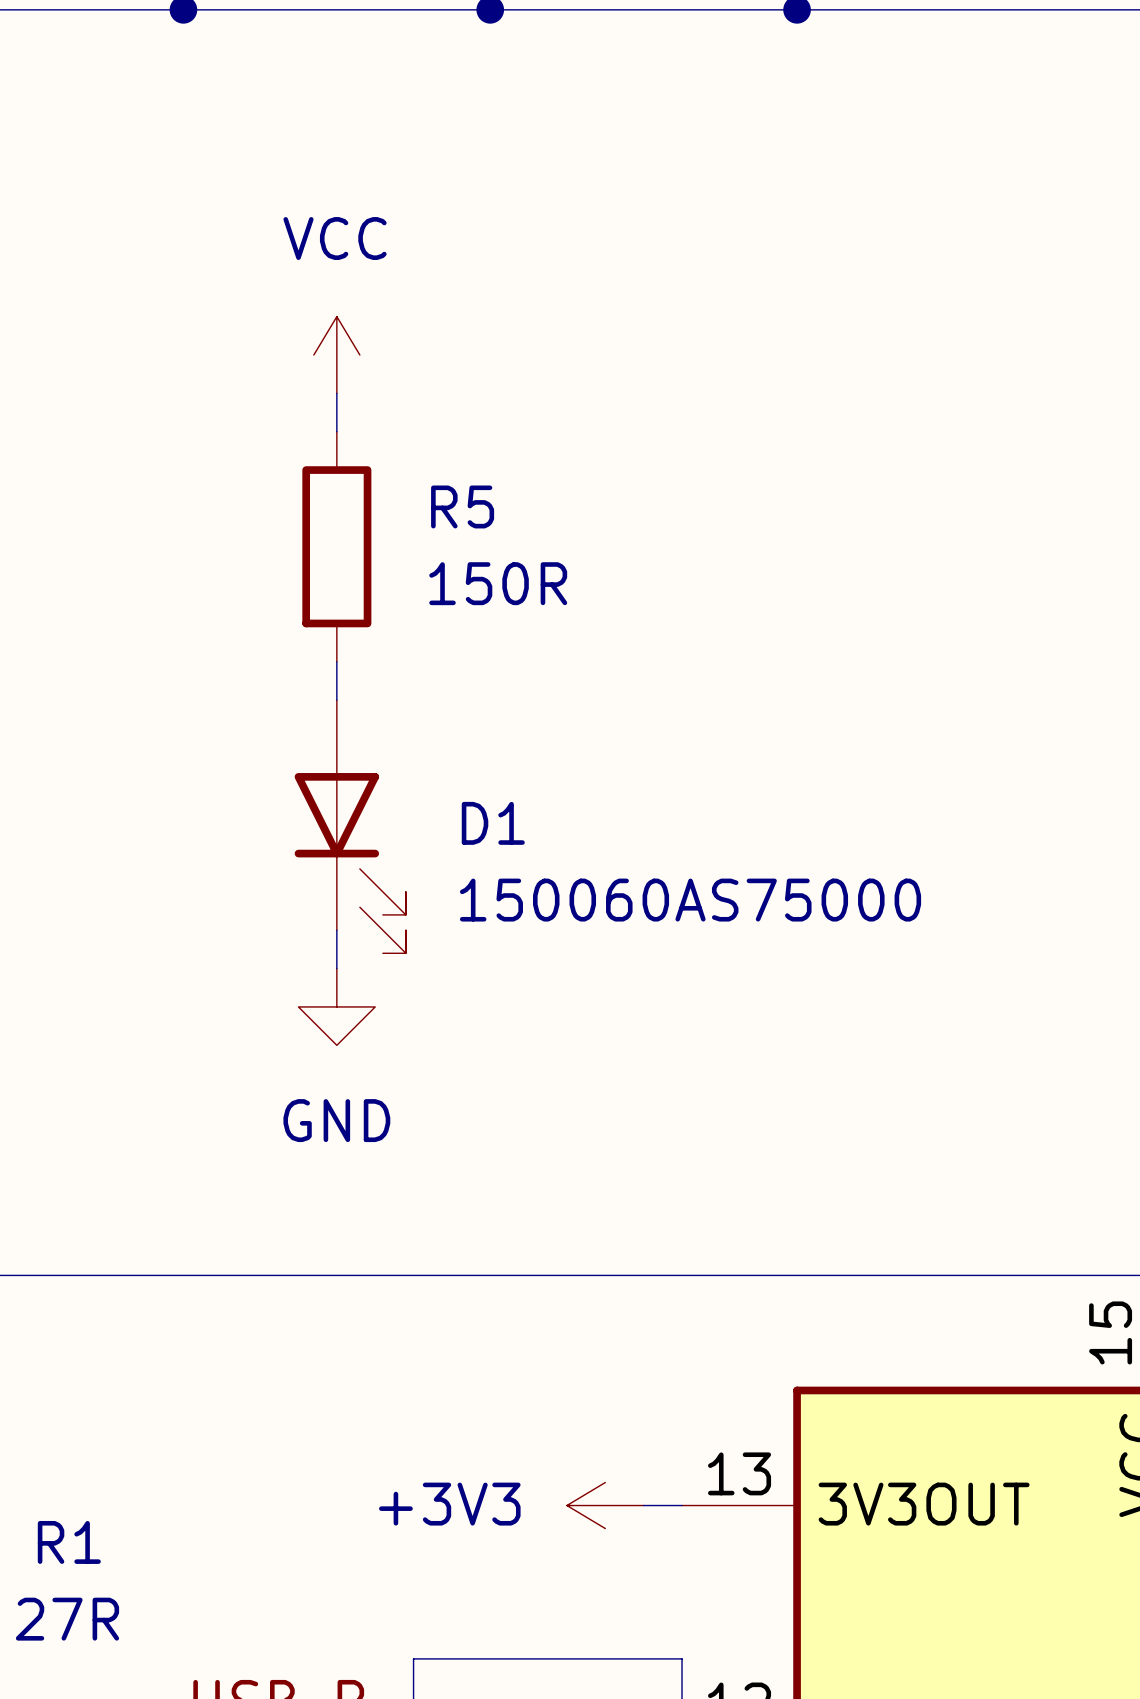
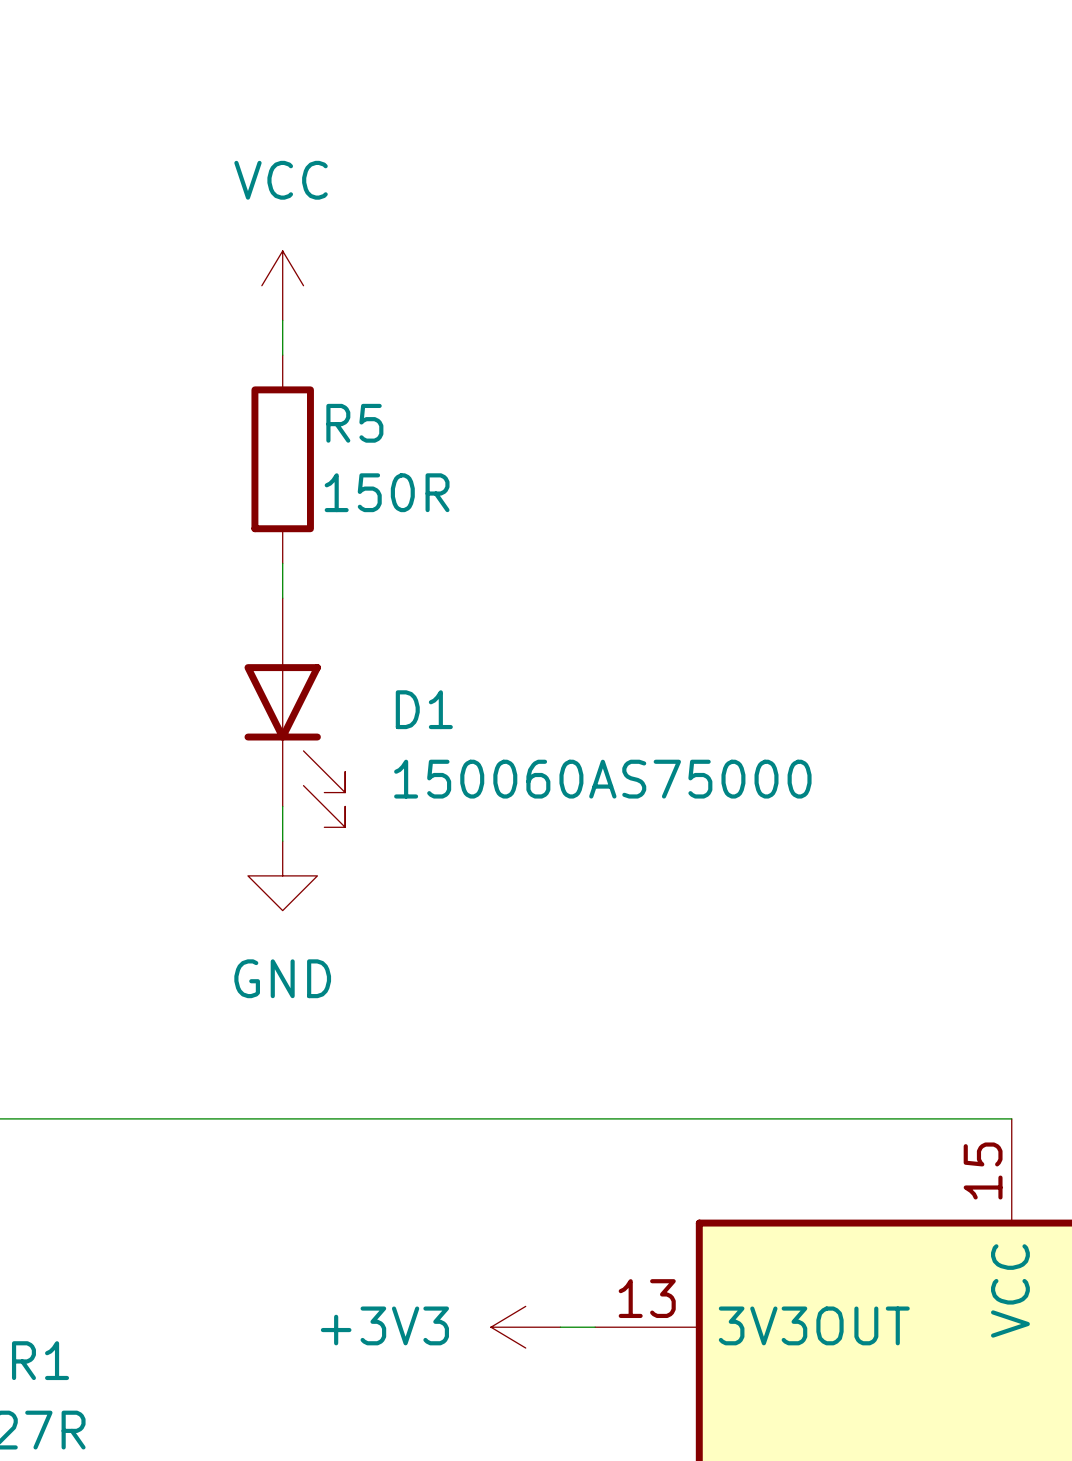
R5 name position: R5 (462, 506) -> R5 (354, 423)
R5 value position: 150R (498, 583) -> 150R (387, 492)

